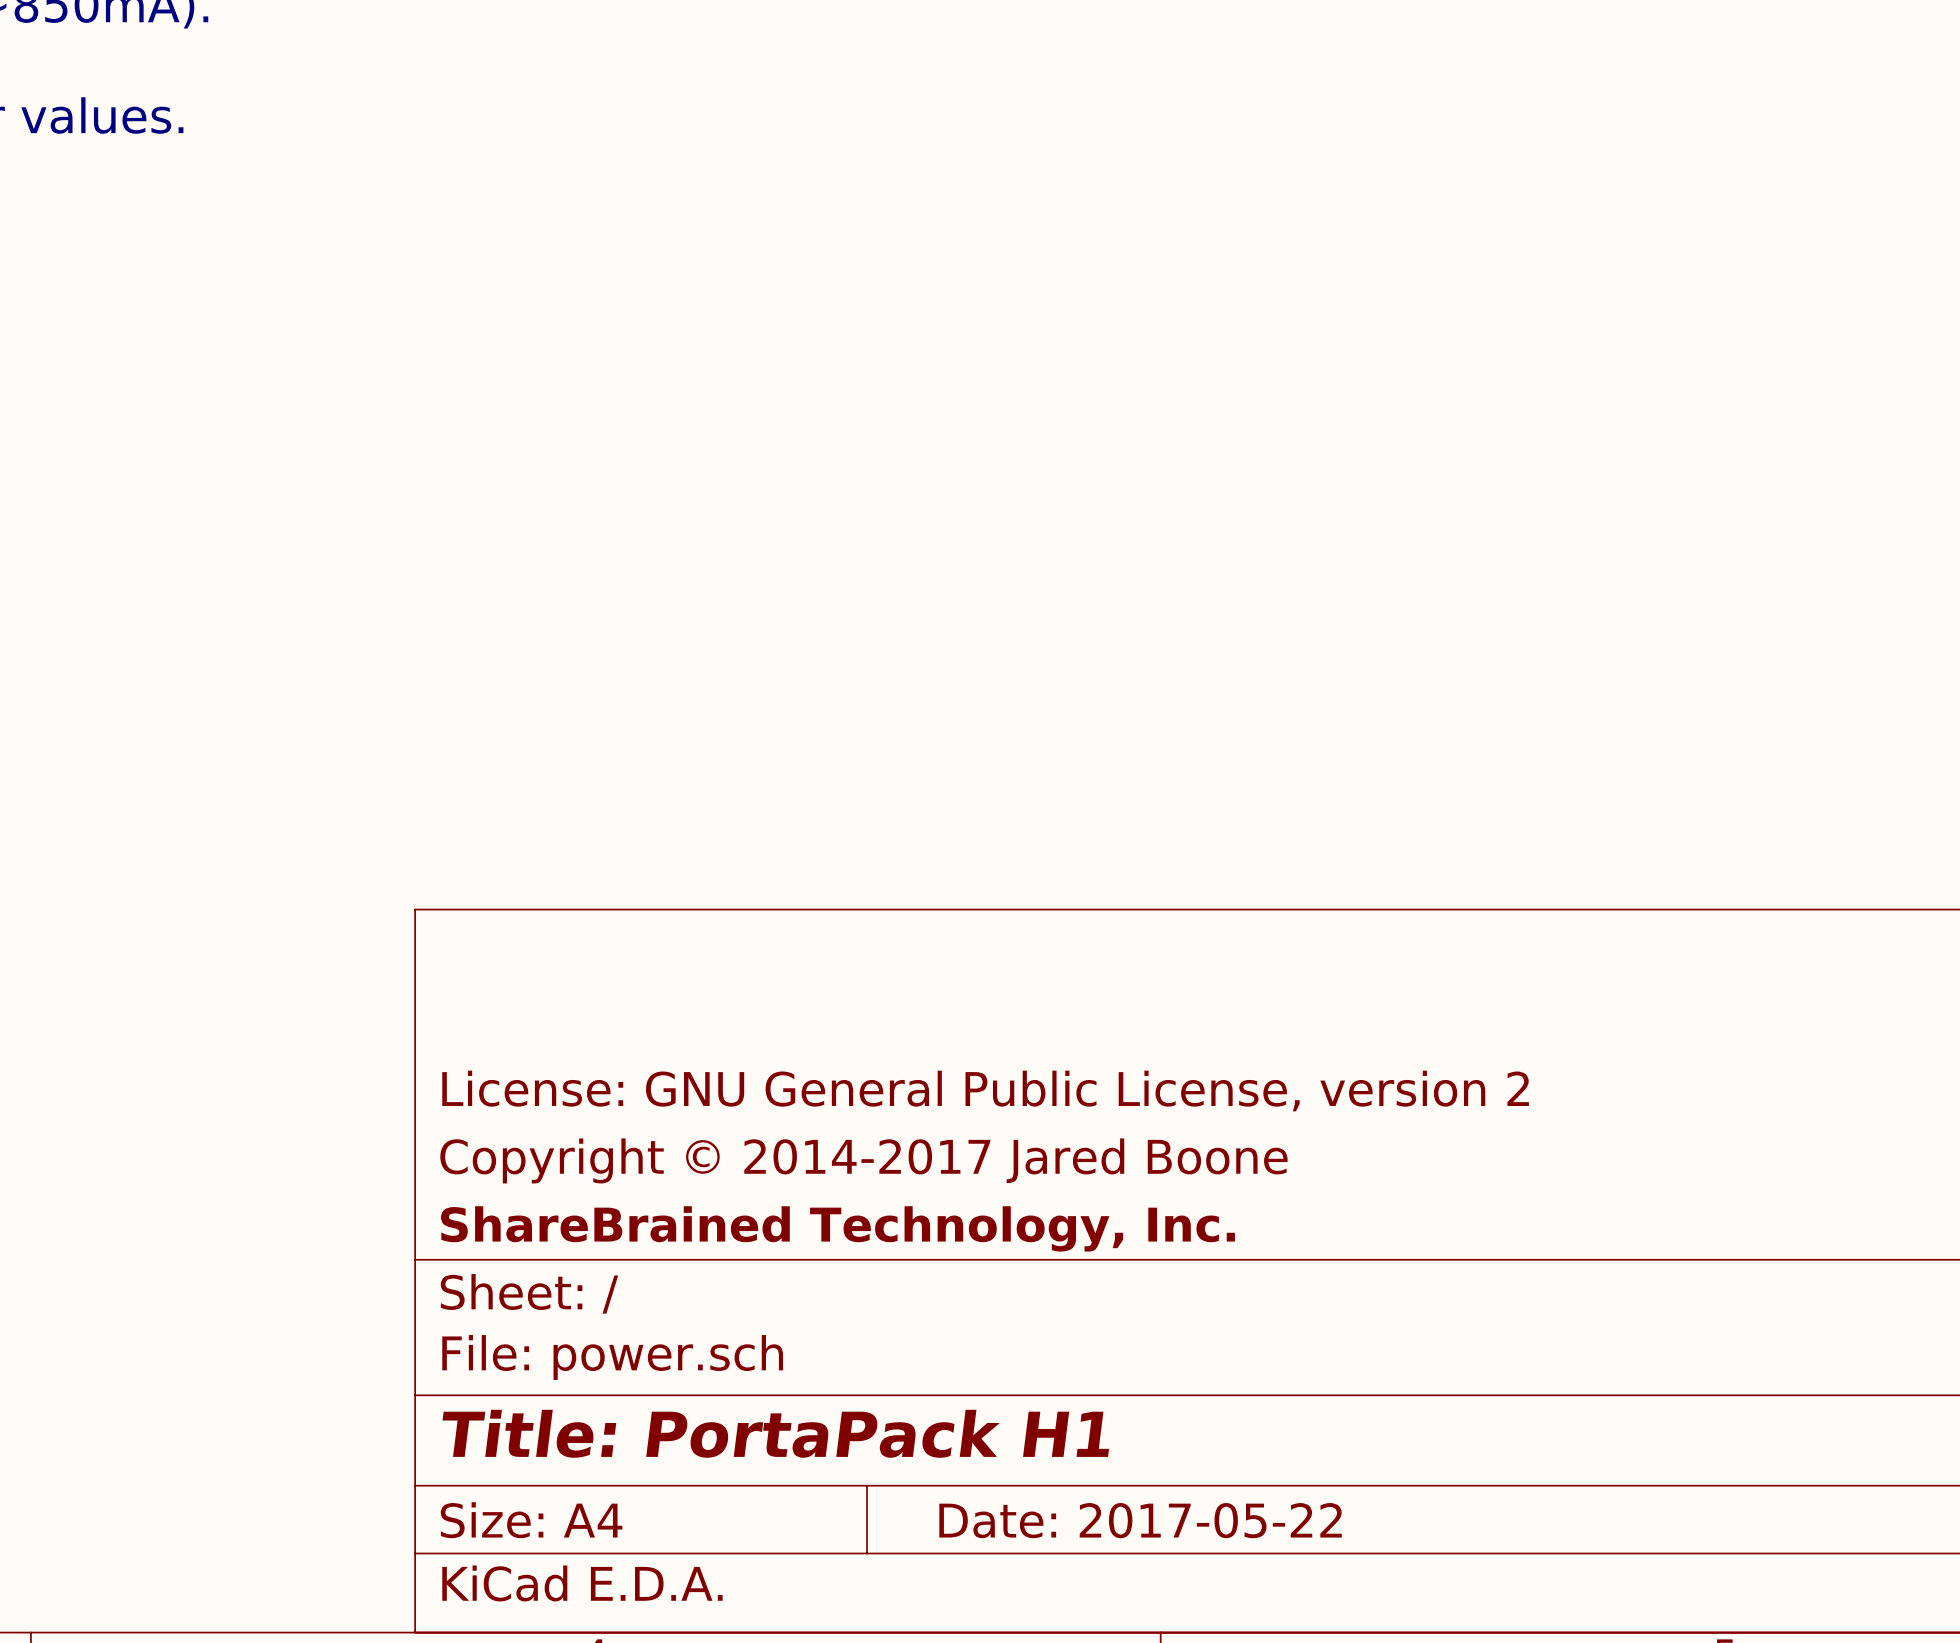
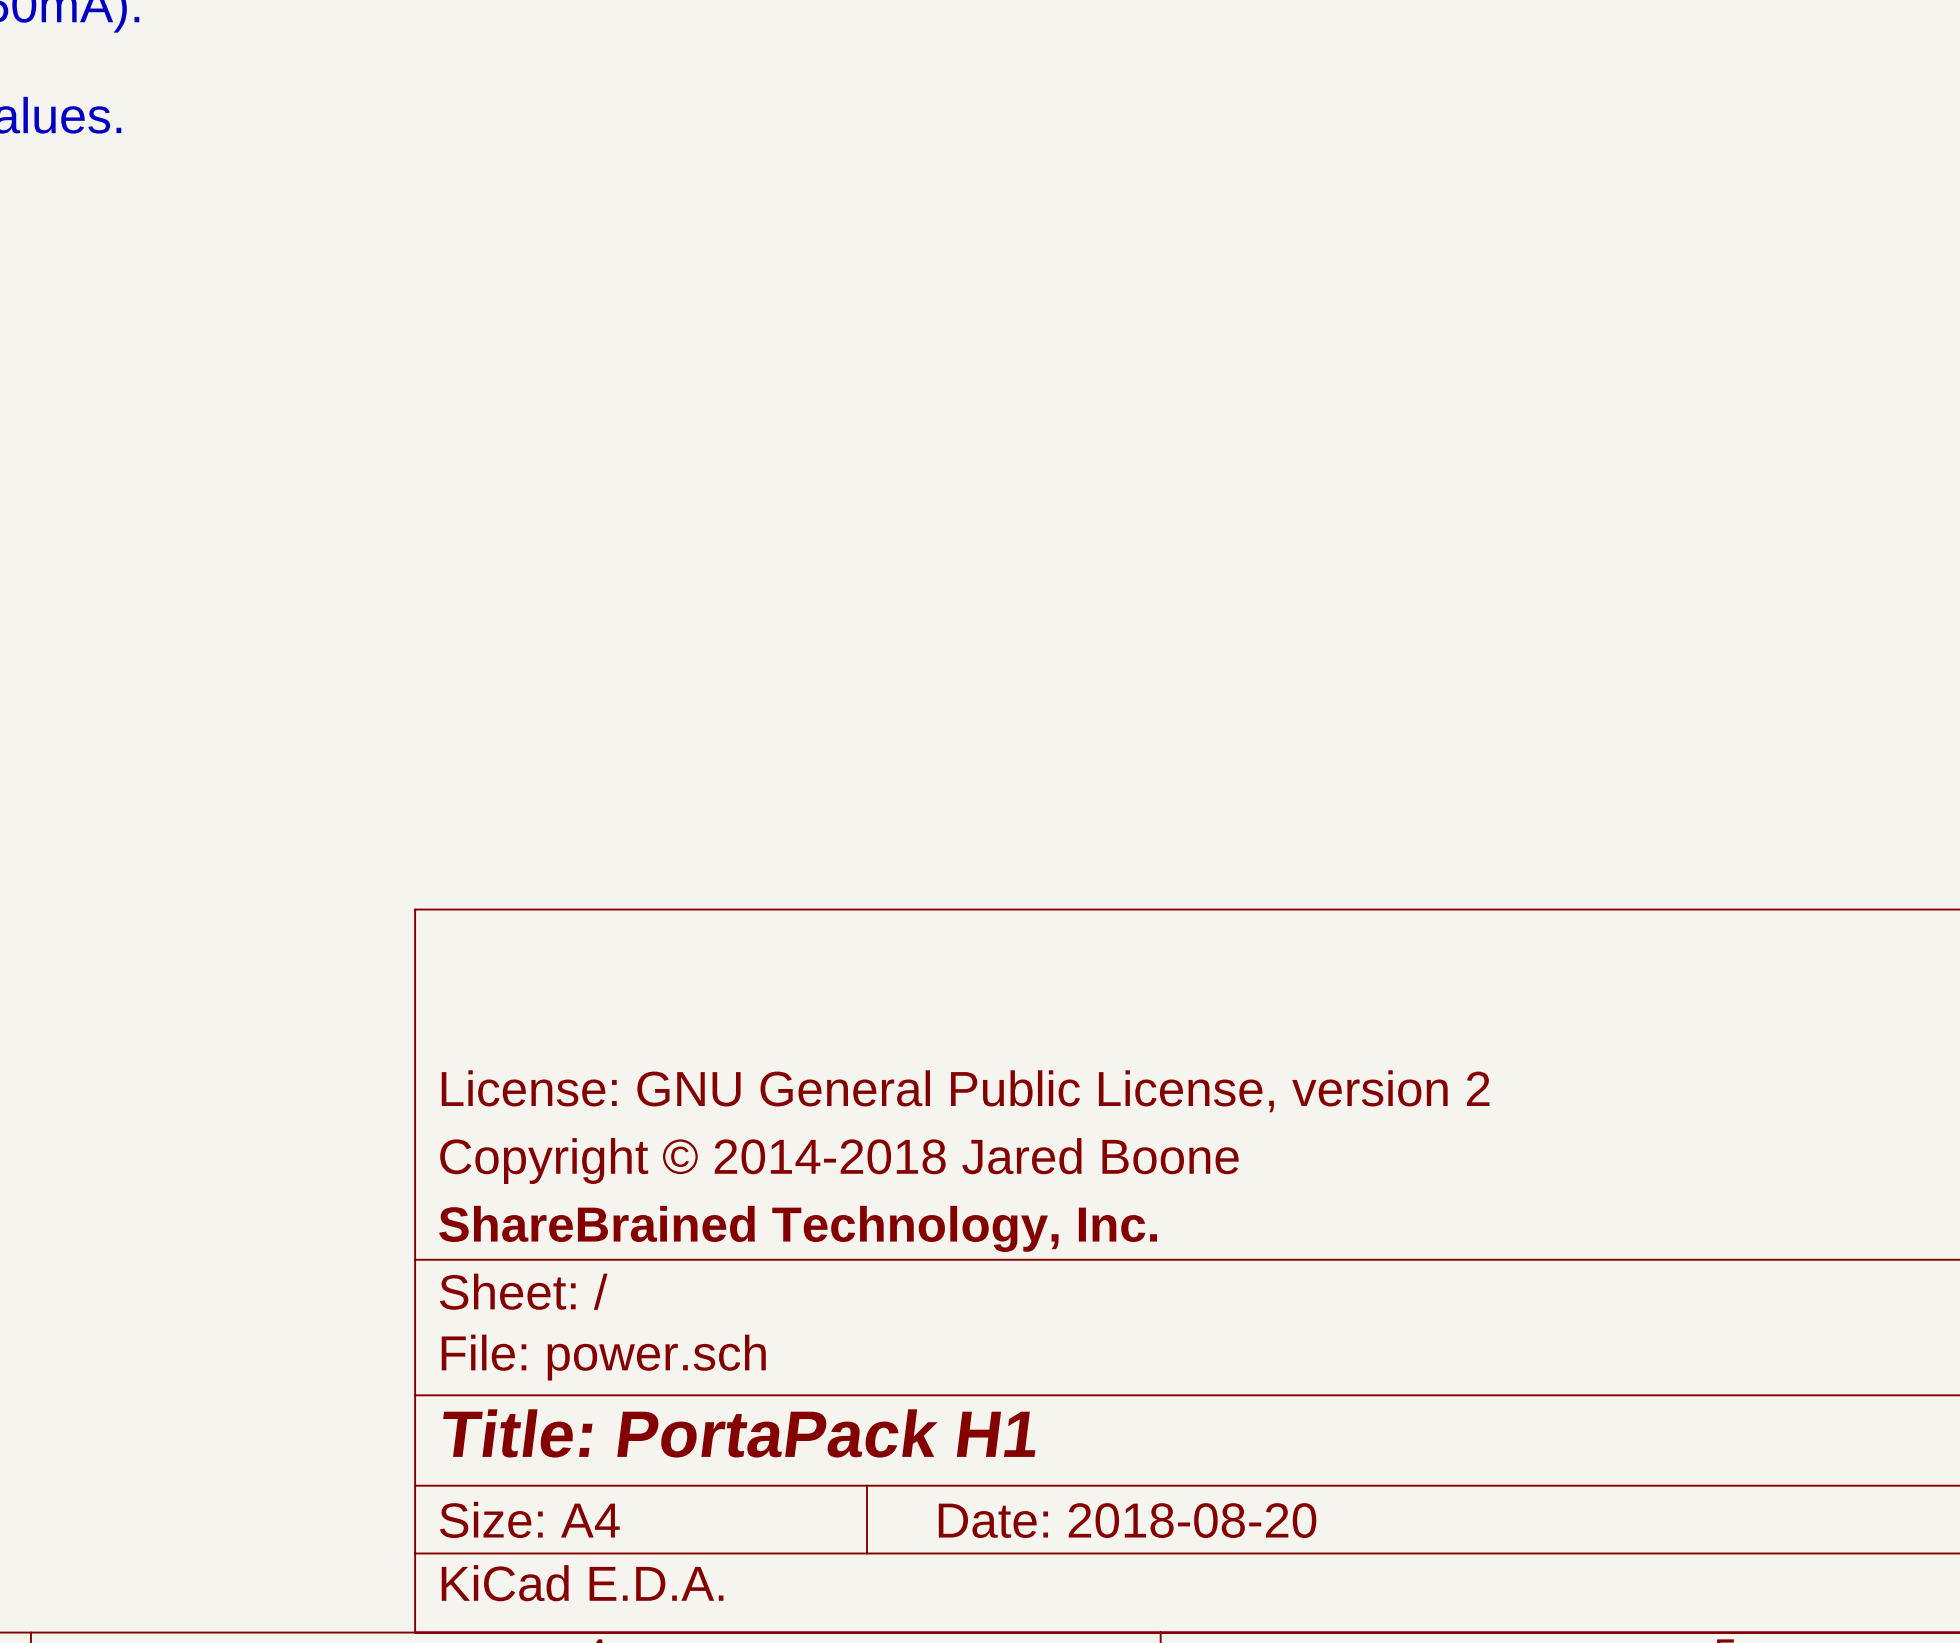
title block: Copyright © 2014-2017 Jared Boone (863, 1160) -> Copyright © 2014-2018 Jared Boone (839, 1161)
title block: Date: 2017-05-22 (1140, 1520) -> Date: 2018-08-20 (1127, 1520)

